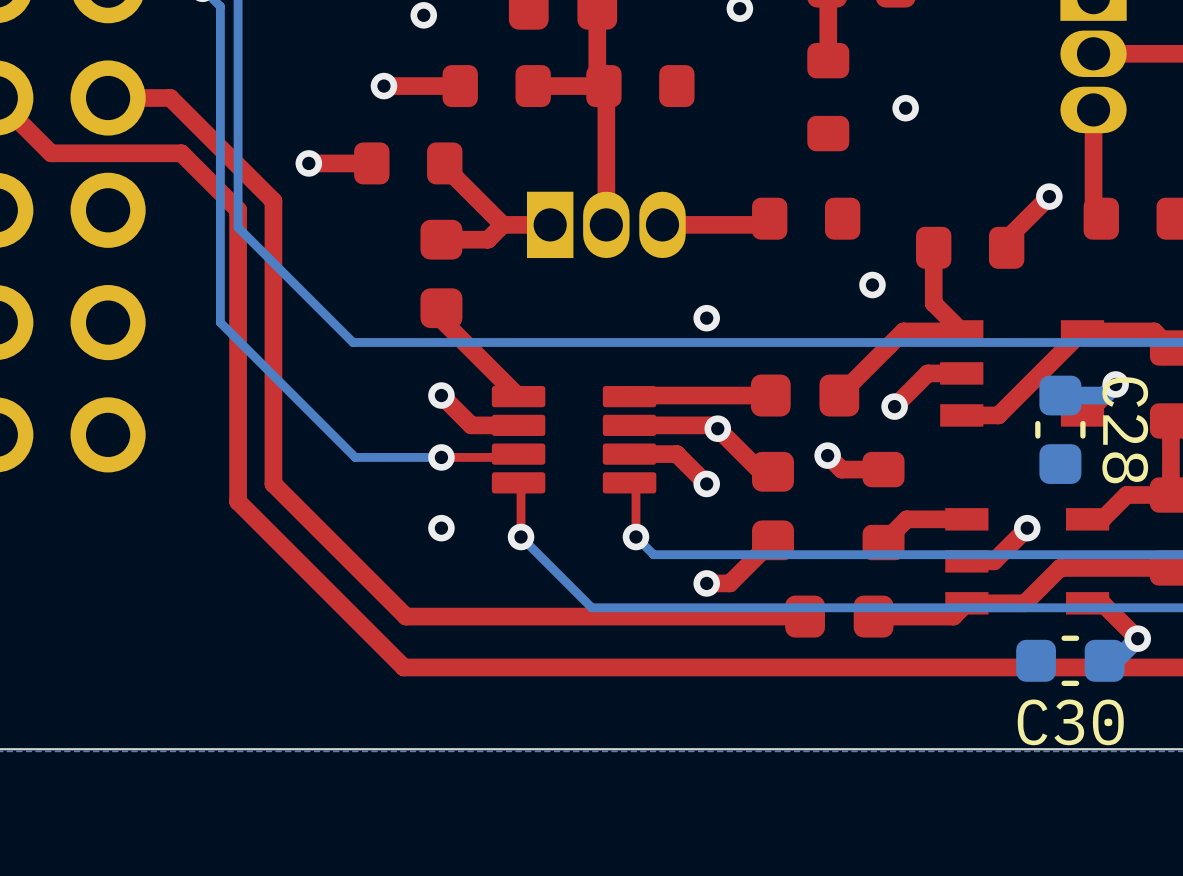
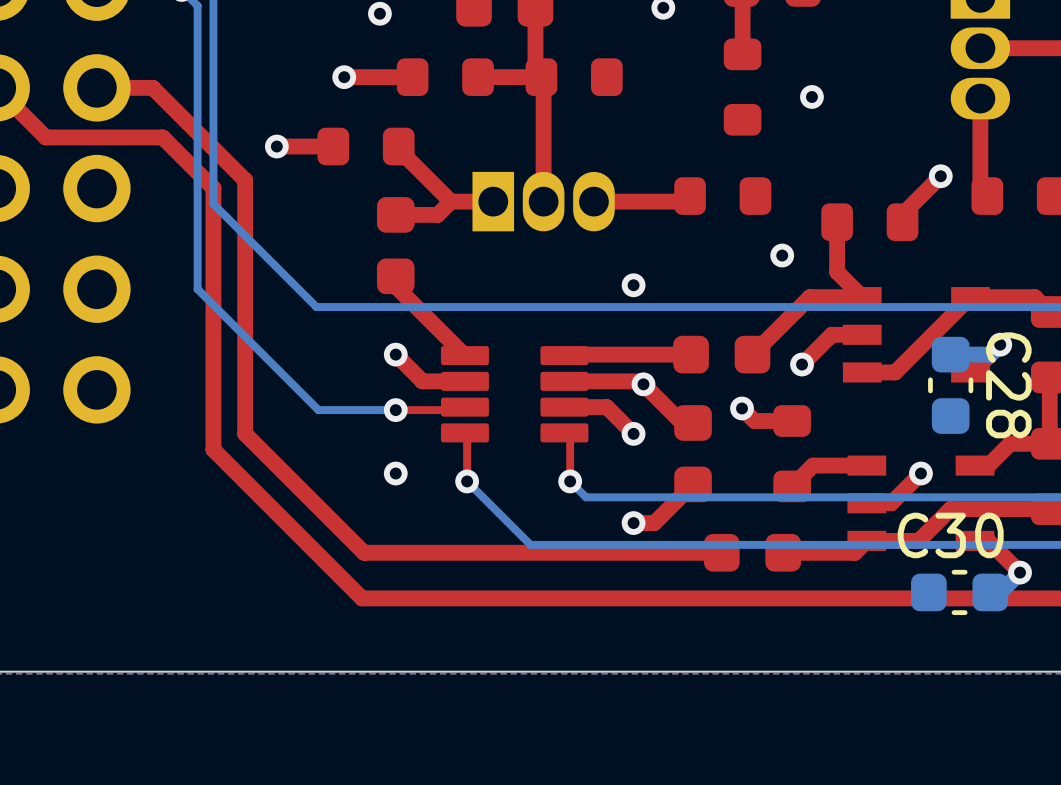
C30 name position: C30 (1070, 722) -> C30 (950, 535)

